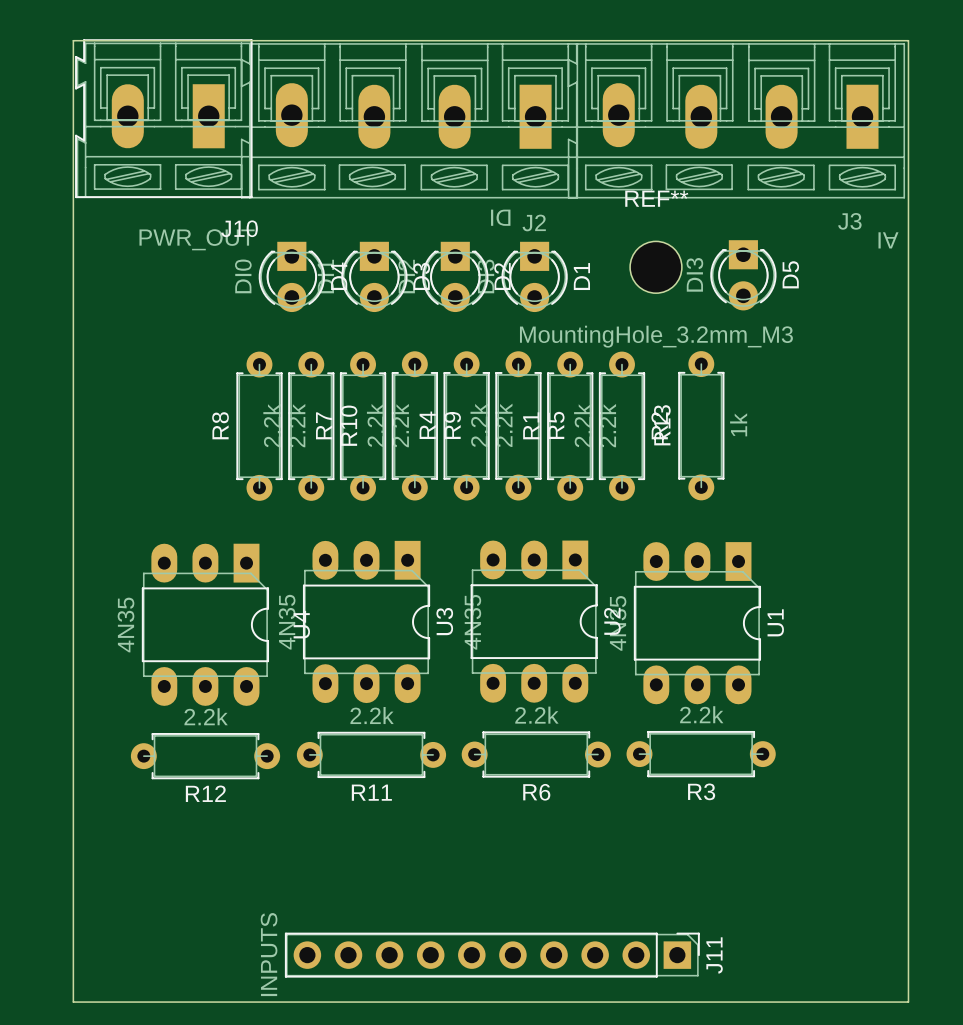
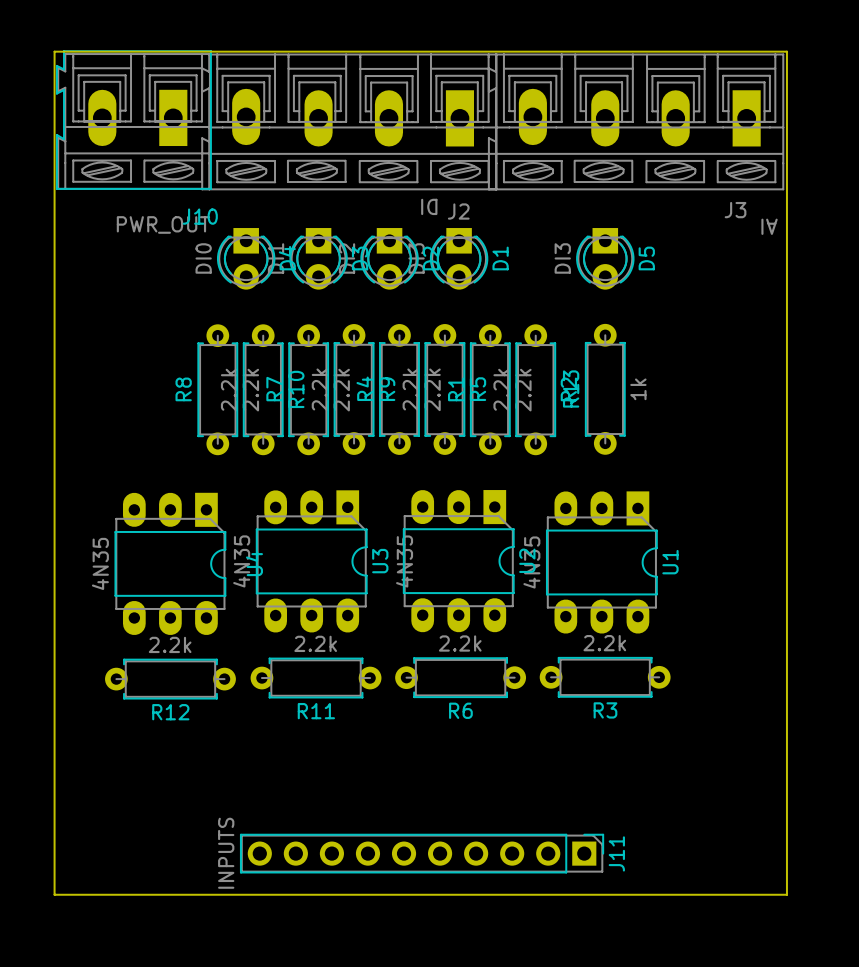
REF**: MountingHole_3.2mm_M3 (655, 267) -> none
D5 position: (743, 275) -> (605, 258)

